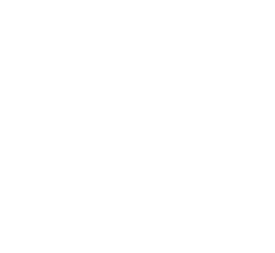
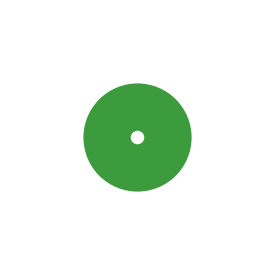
part: none -> (137, 137)

